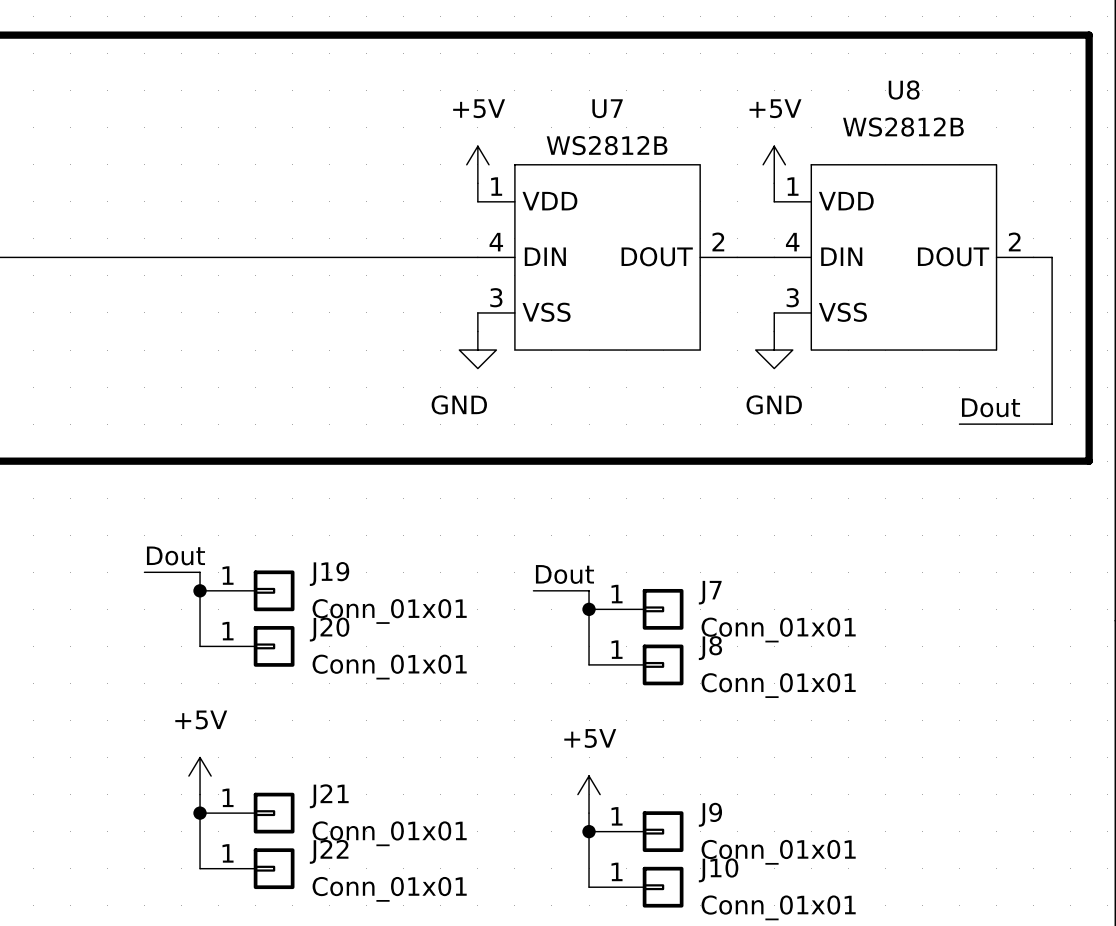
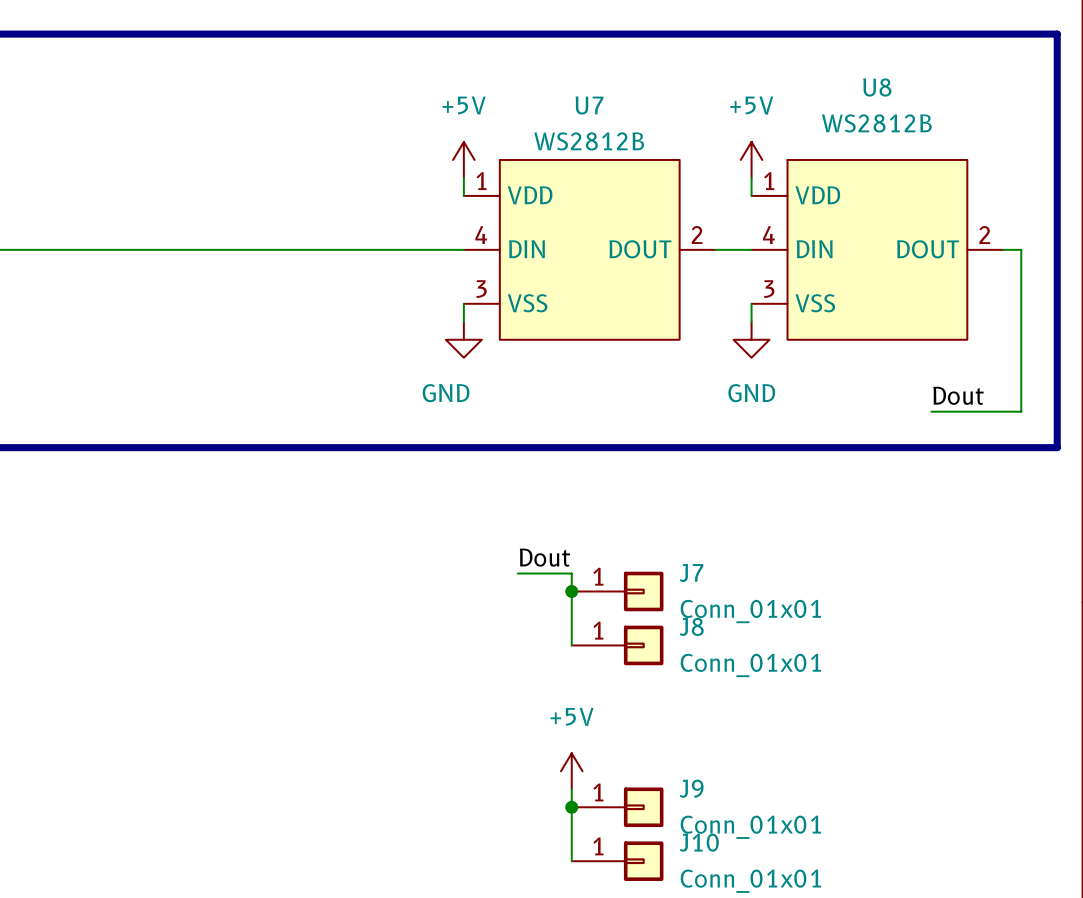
label: Dout (175, 555) -> none
wire: (144, 572) (200, 572) (200, 646) -> none
junction: (200, 590) -> none
J19: Conn_01x01 (247, 590) -> none
J20: Conn_01x01 (247, 646) -> none
power symbol: +5V (200, 776) -> none
wire: (200, 794) (200, 868) -> none
junction: (200, 813) -> none
J21: Conn_01x01 (247, 813) -> none
J22: Conn_01x01 (247, 868) -> none

